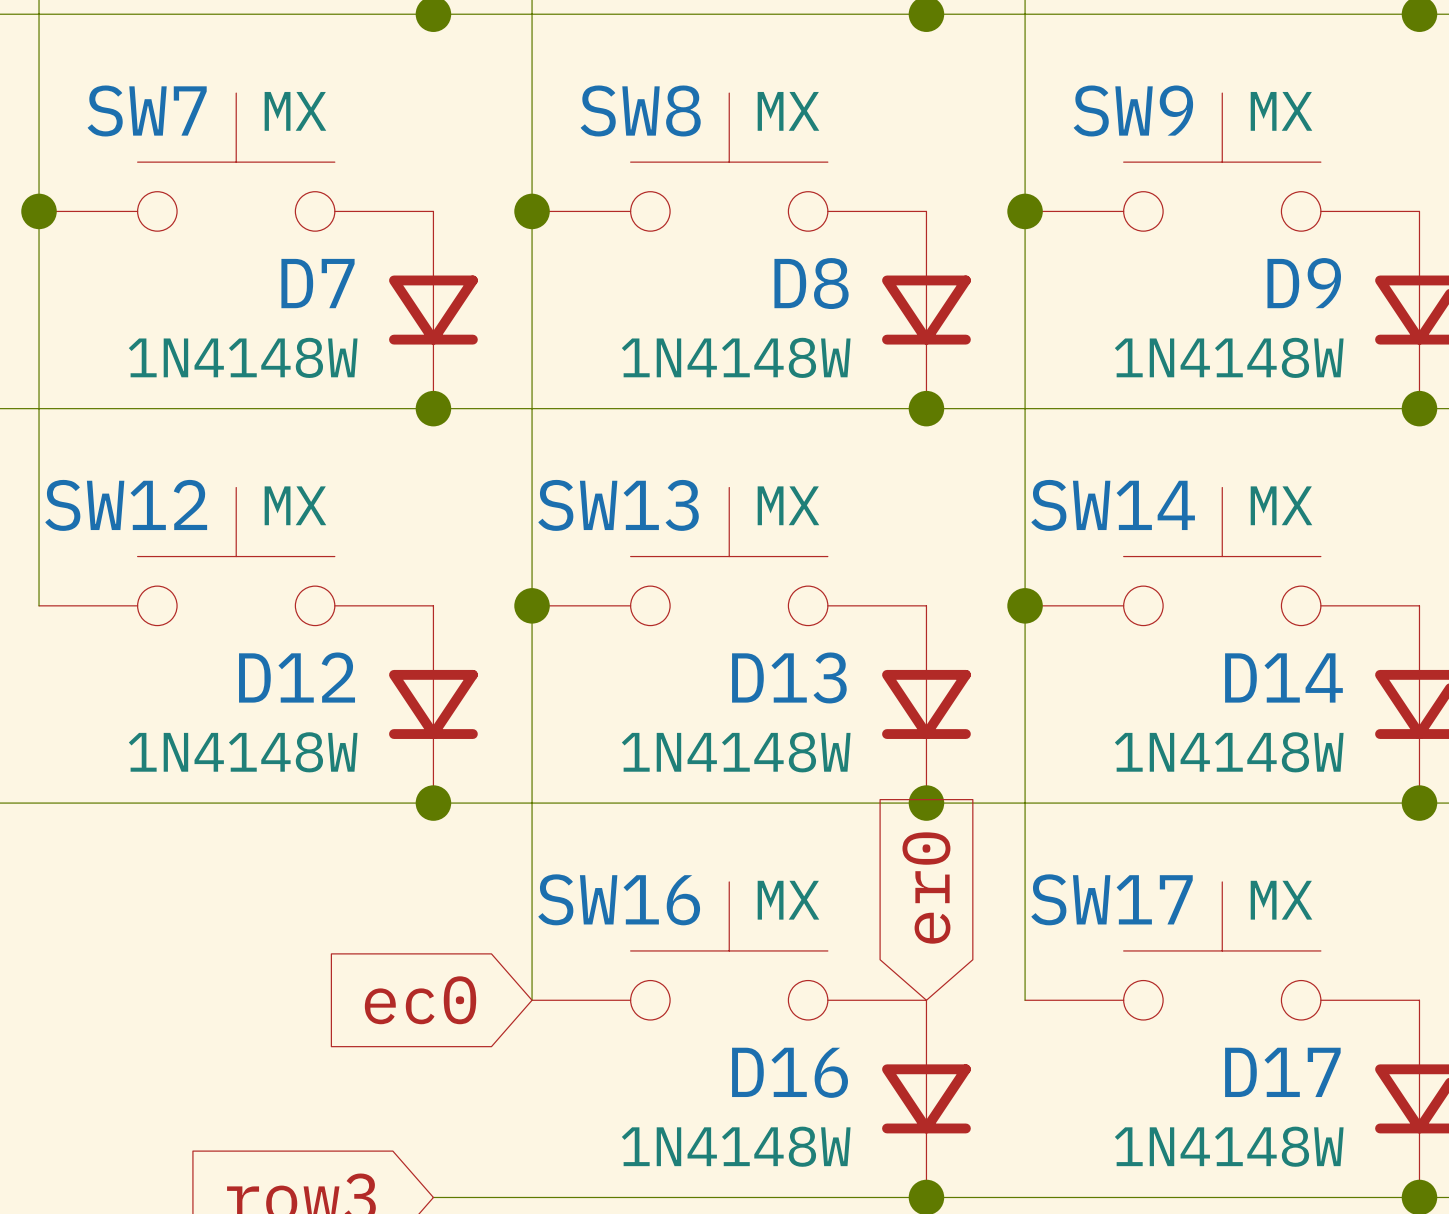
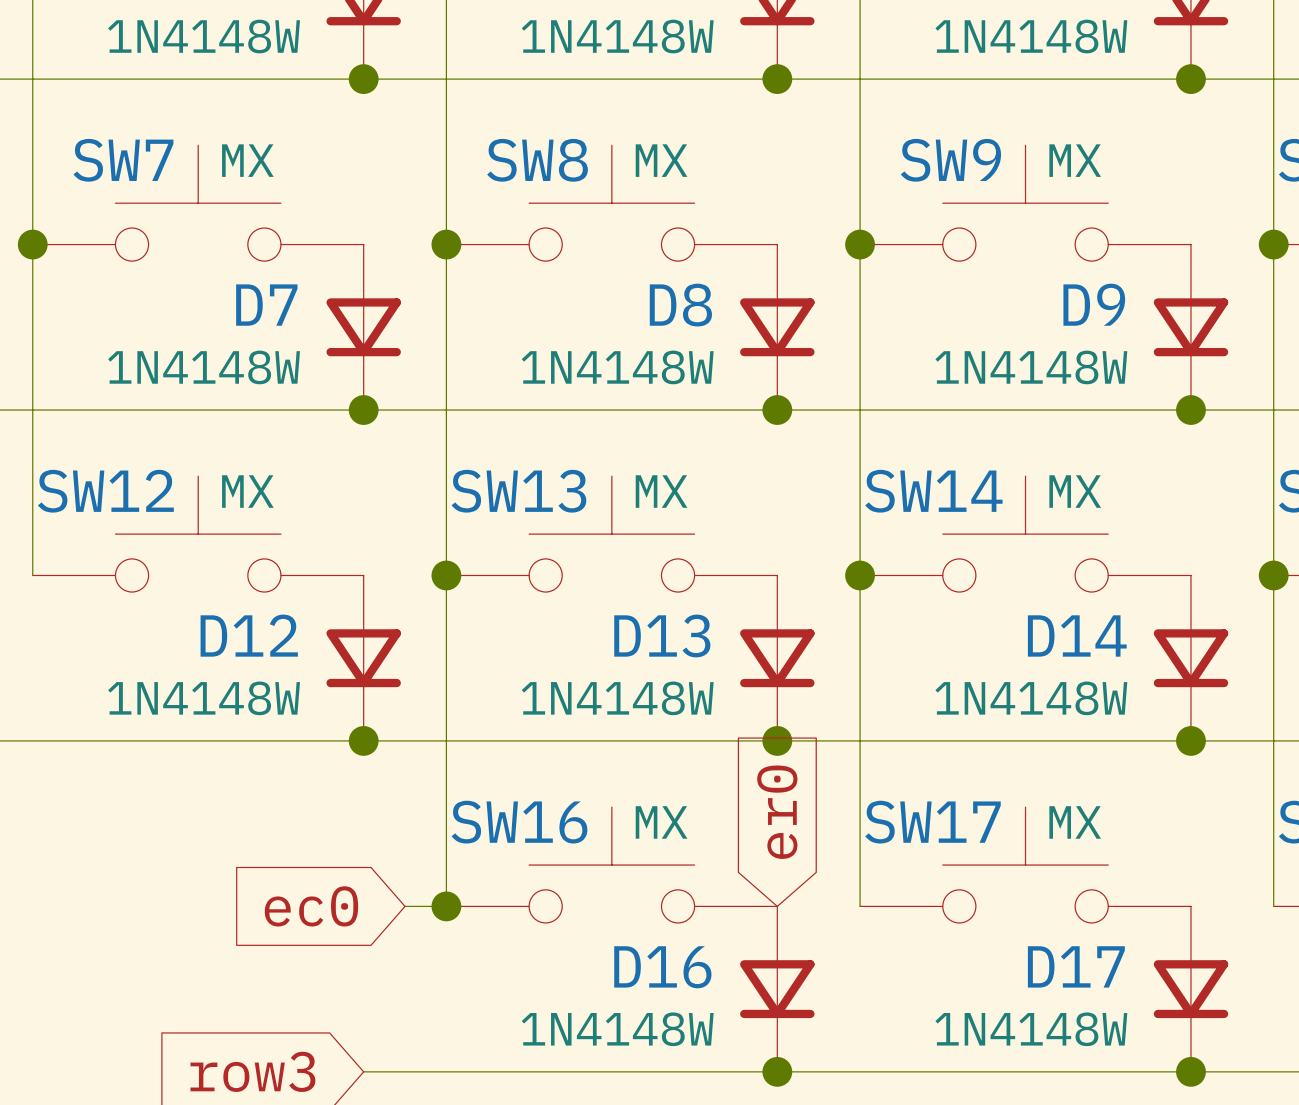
global label position: ec0 (420, 1000) -> ec0 (311, 906)
wire: none -> (405, 906) (446, 906)
junction: none -> (446, 906)

